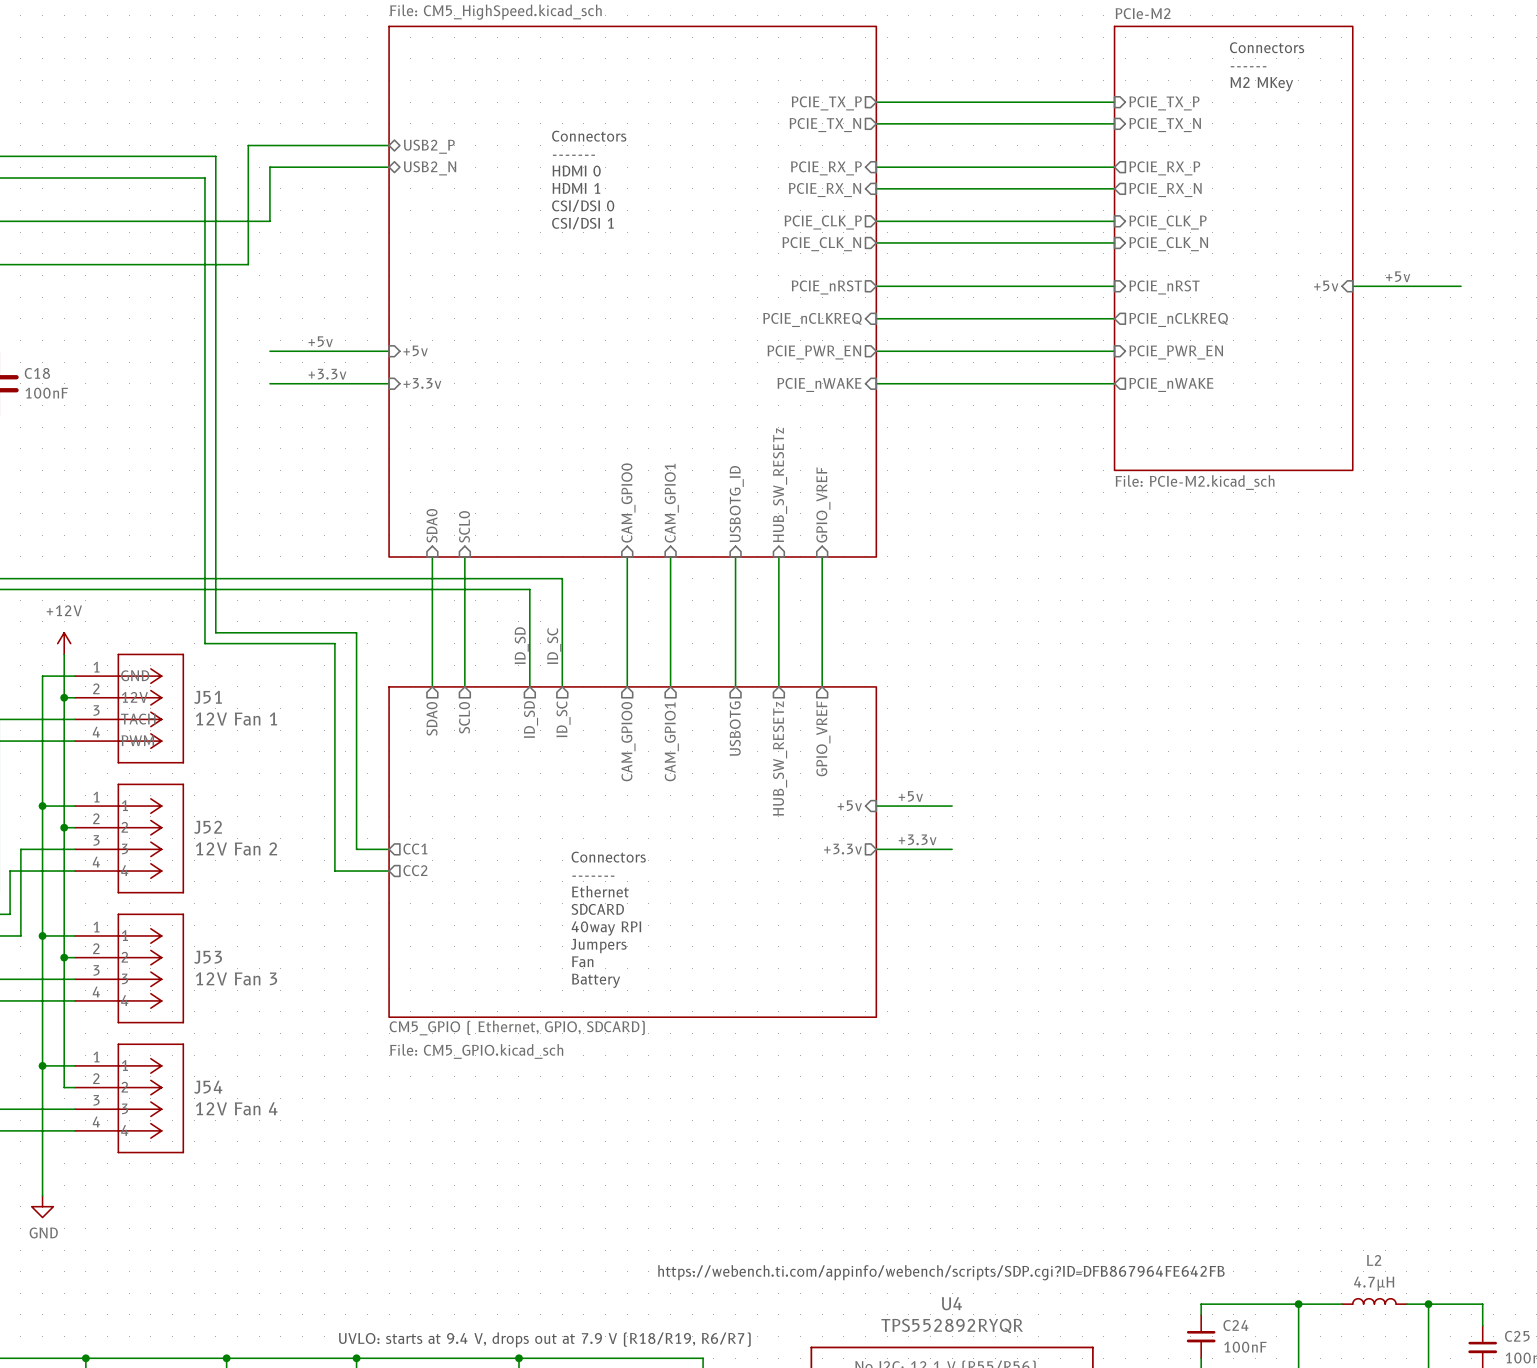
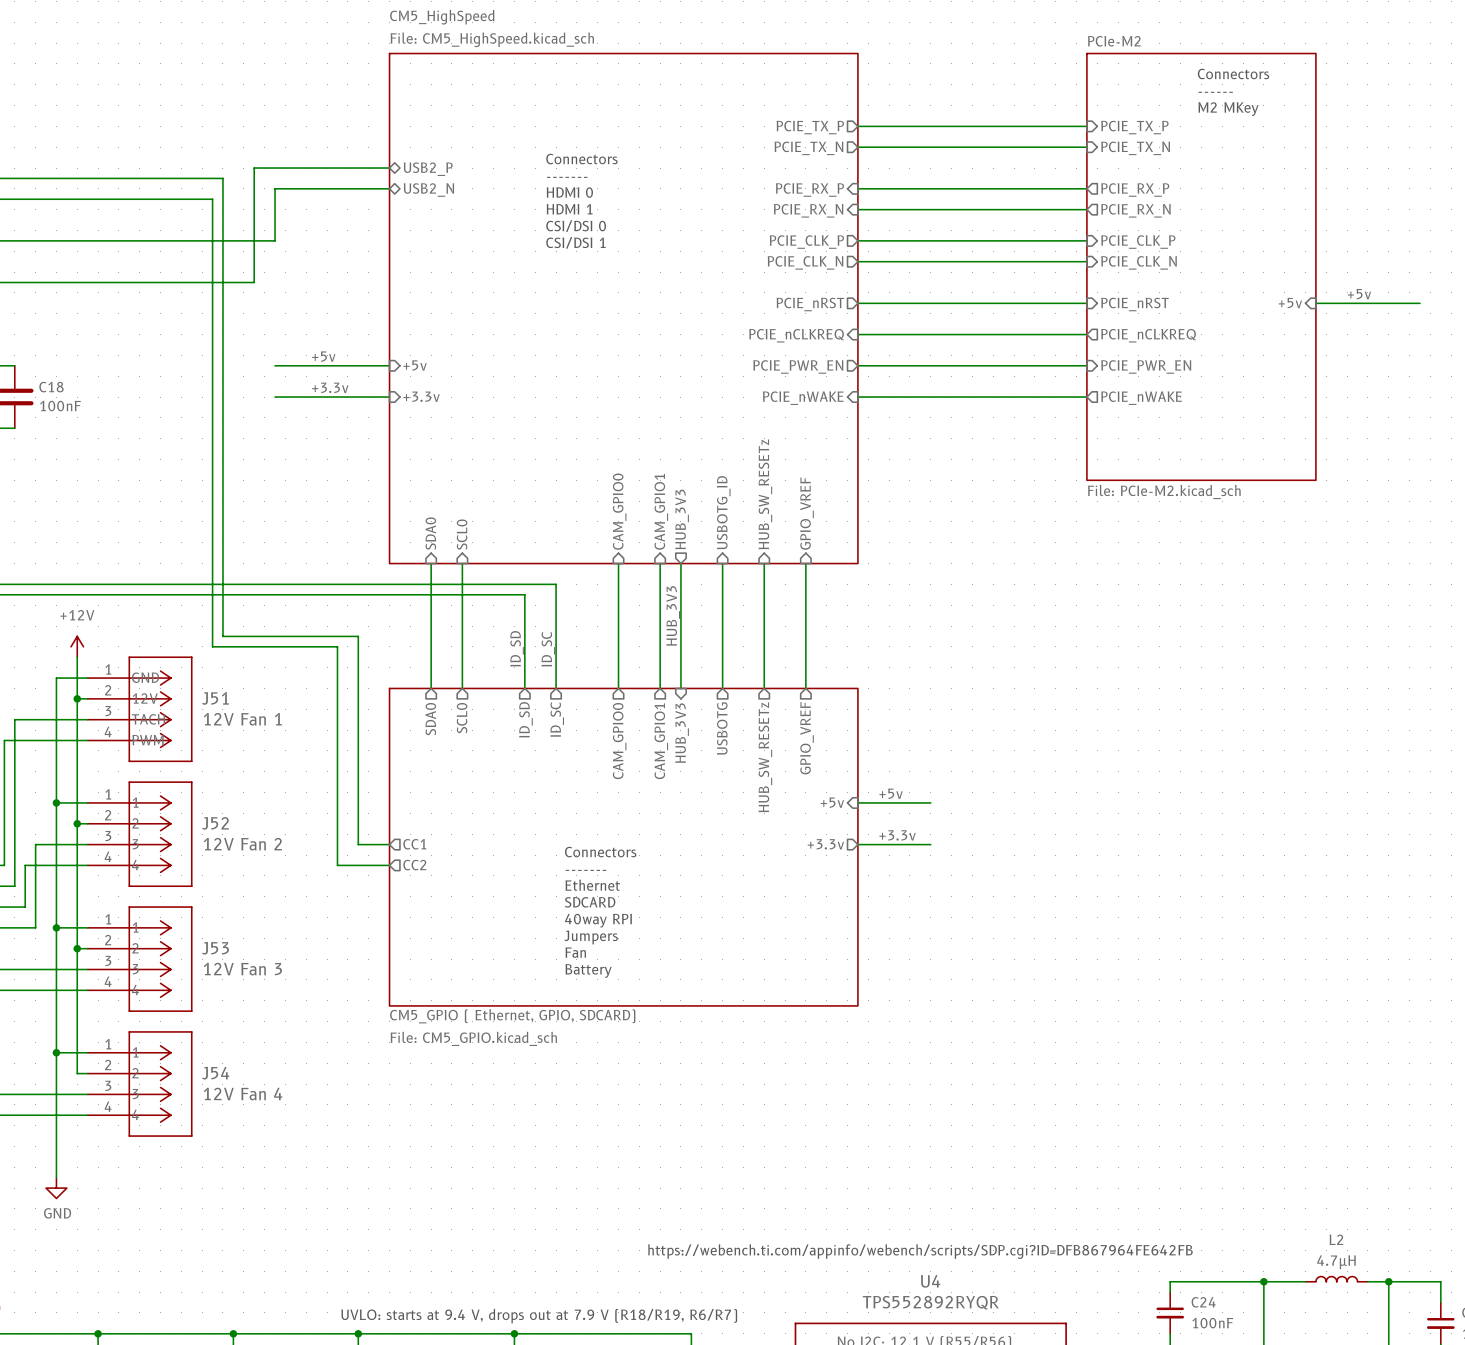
sheet pin: none -> HUB_3V3 (682, 519)
wire: none -> (680, 563) (680, 688)
label: none -> HUB_3V3 (673, 615)
sheet pin: none -> HUB_3V3 (682, 733)

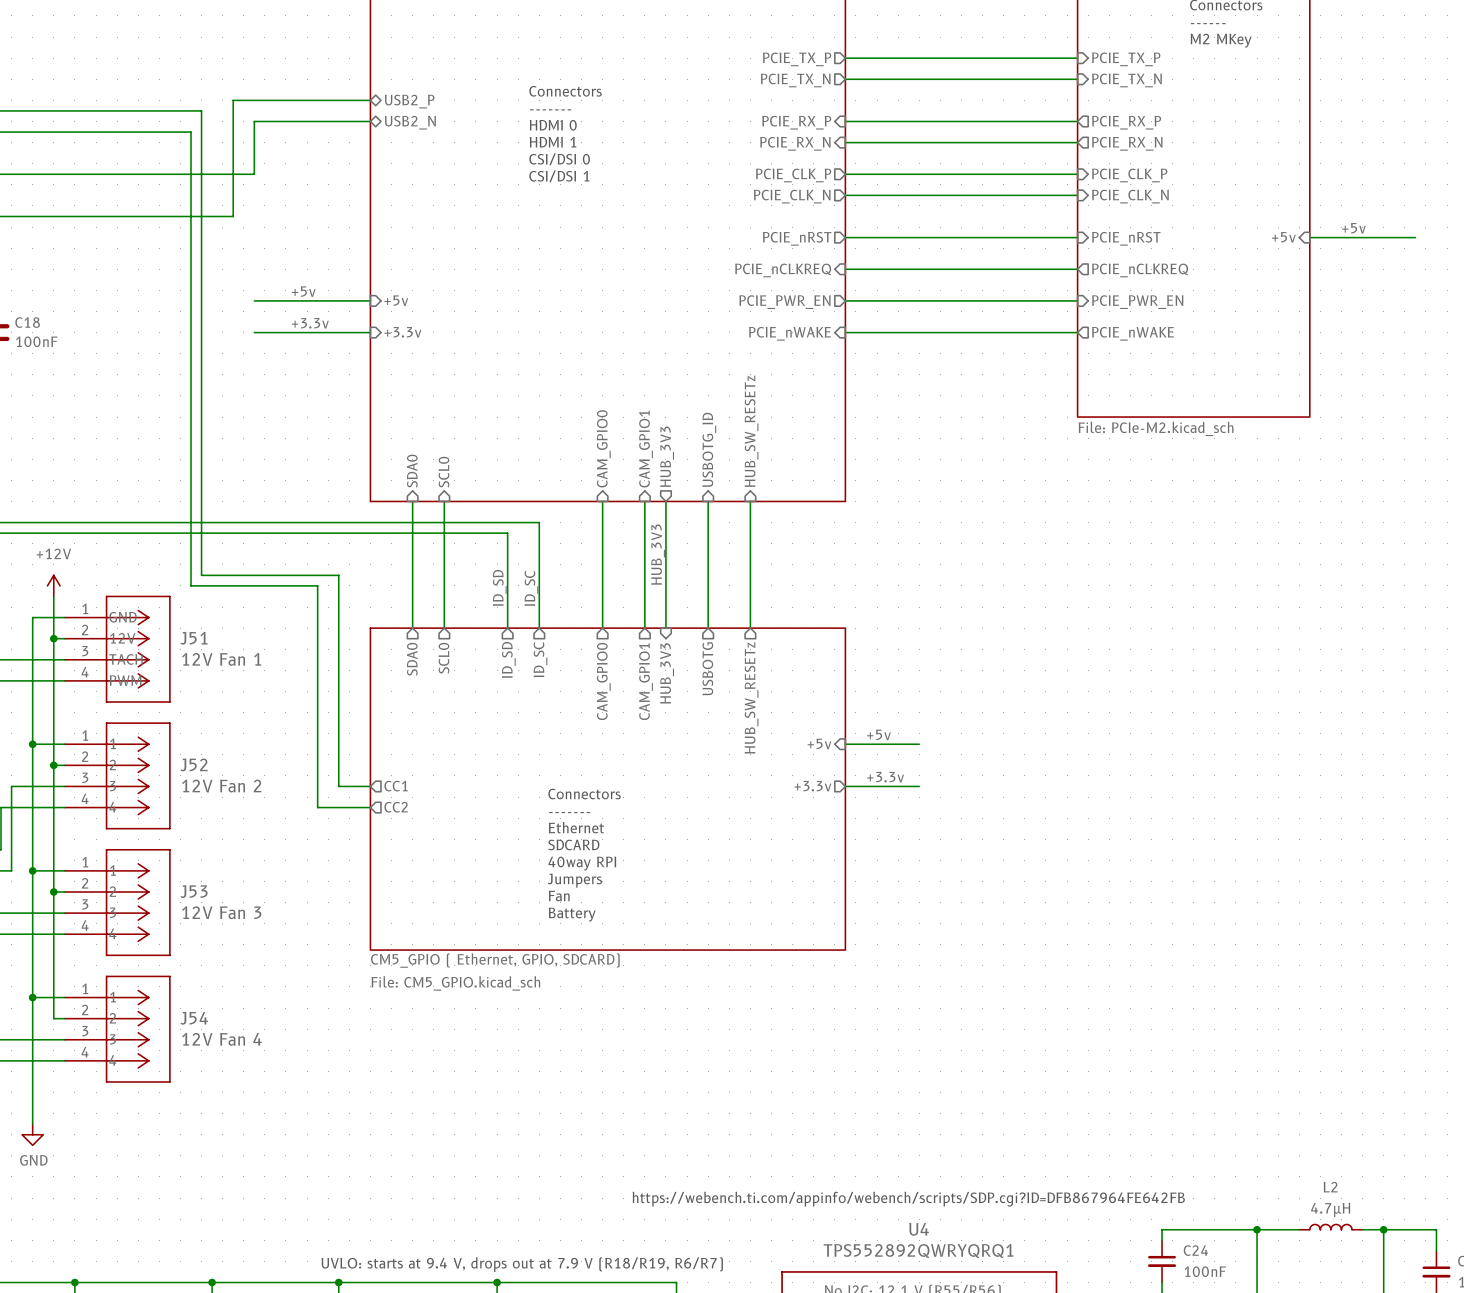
sheet pin: GPIO_VREF (807, 513) -> none
wire: (805, 563) (805, 688) -> none
sheet pin: GPIO_VREF (807, 738) -> none
U4 value: TPS552892RYQR (930, 1302) -> TPS552892QWRYQRQ1 (918, 1250)

